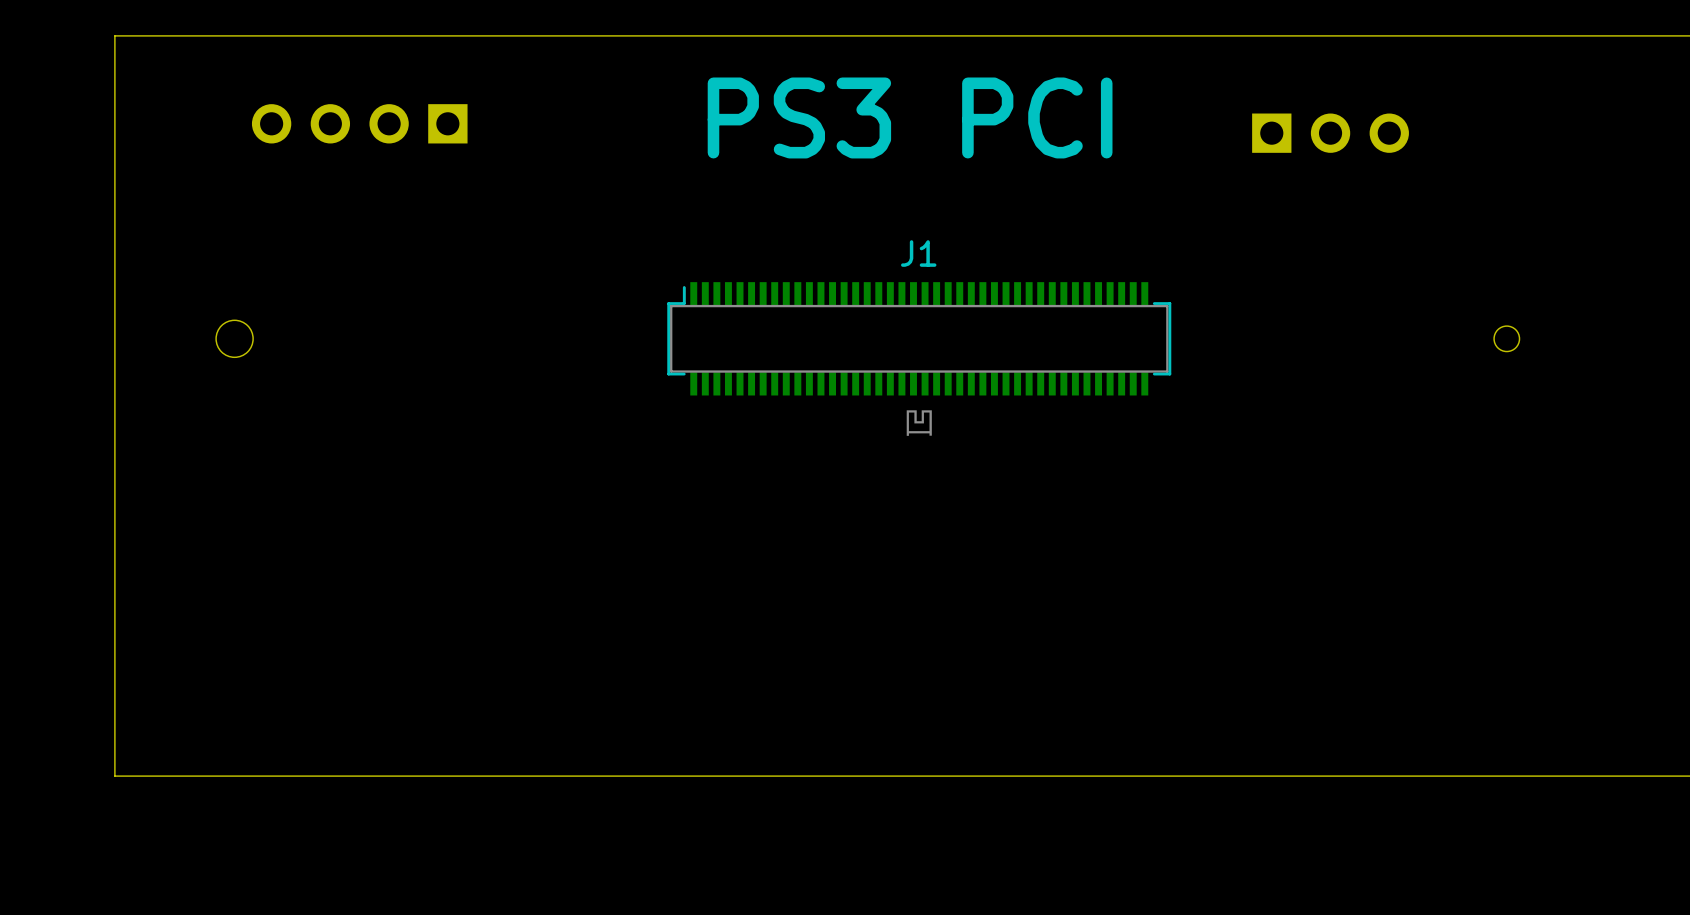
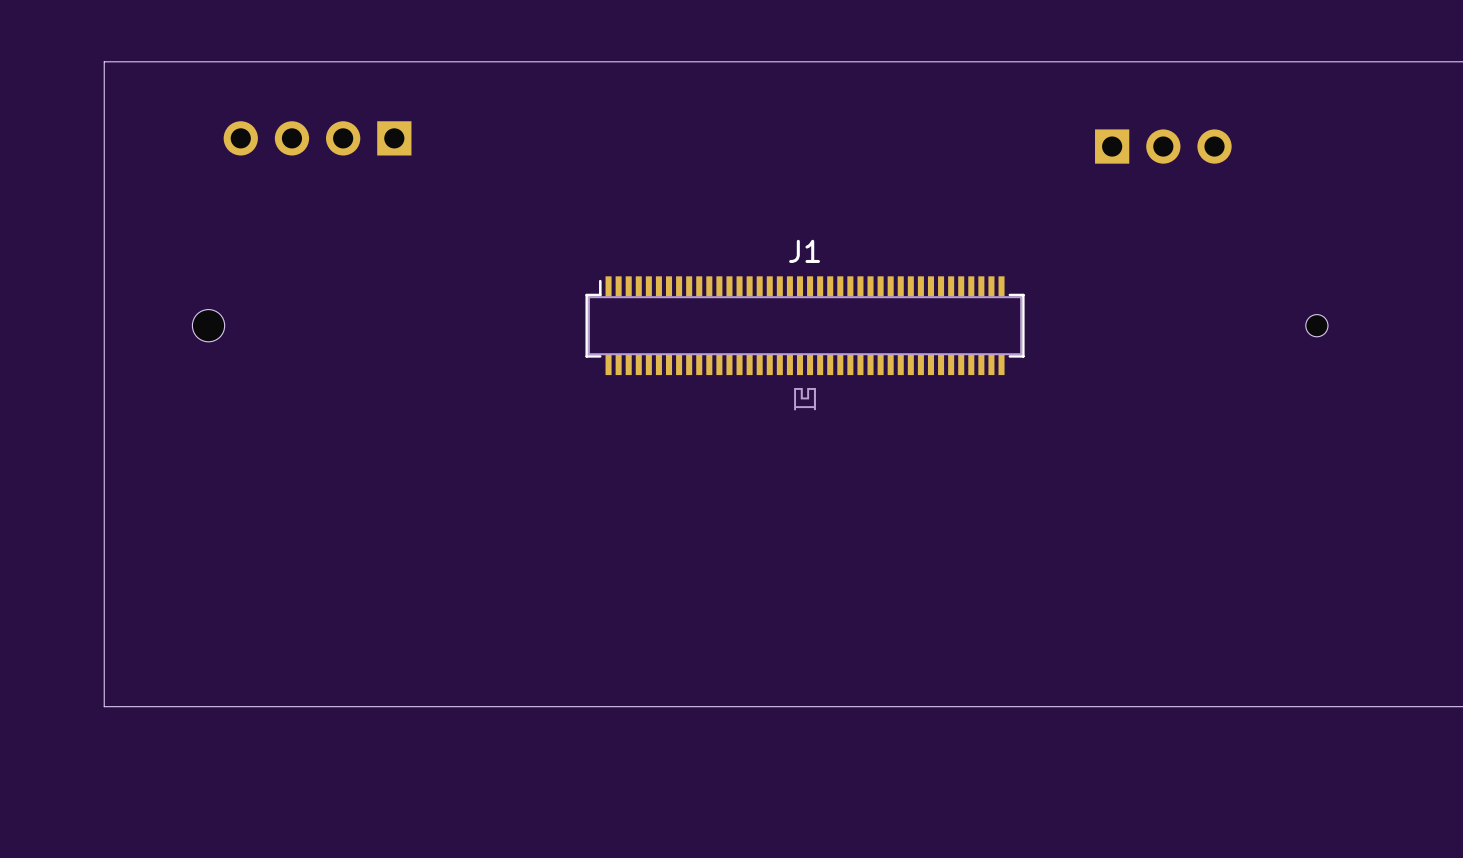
text: PS3 PCI (910, 117) -> none

